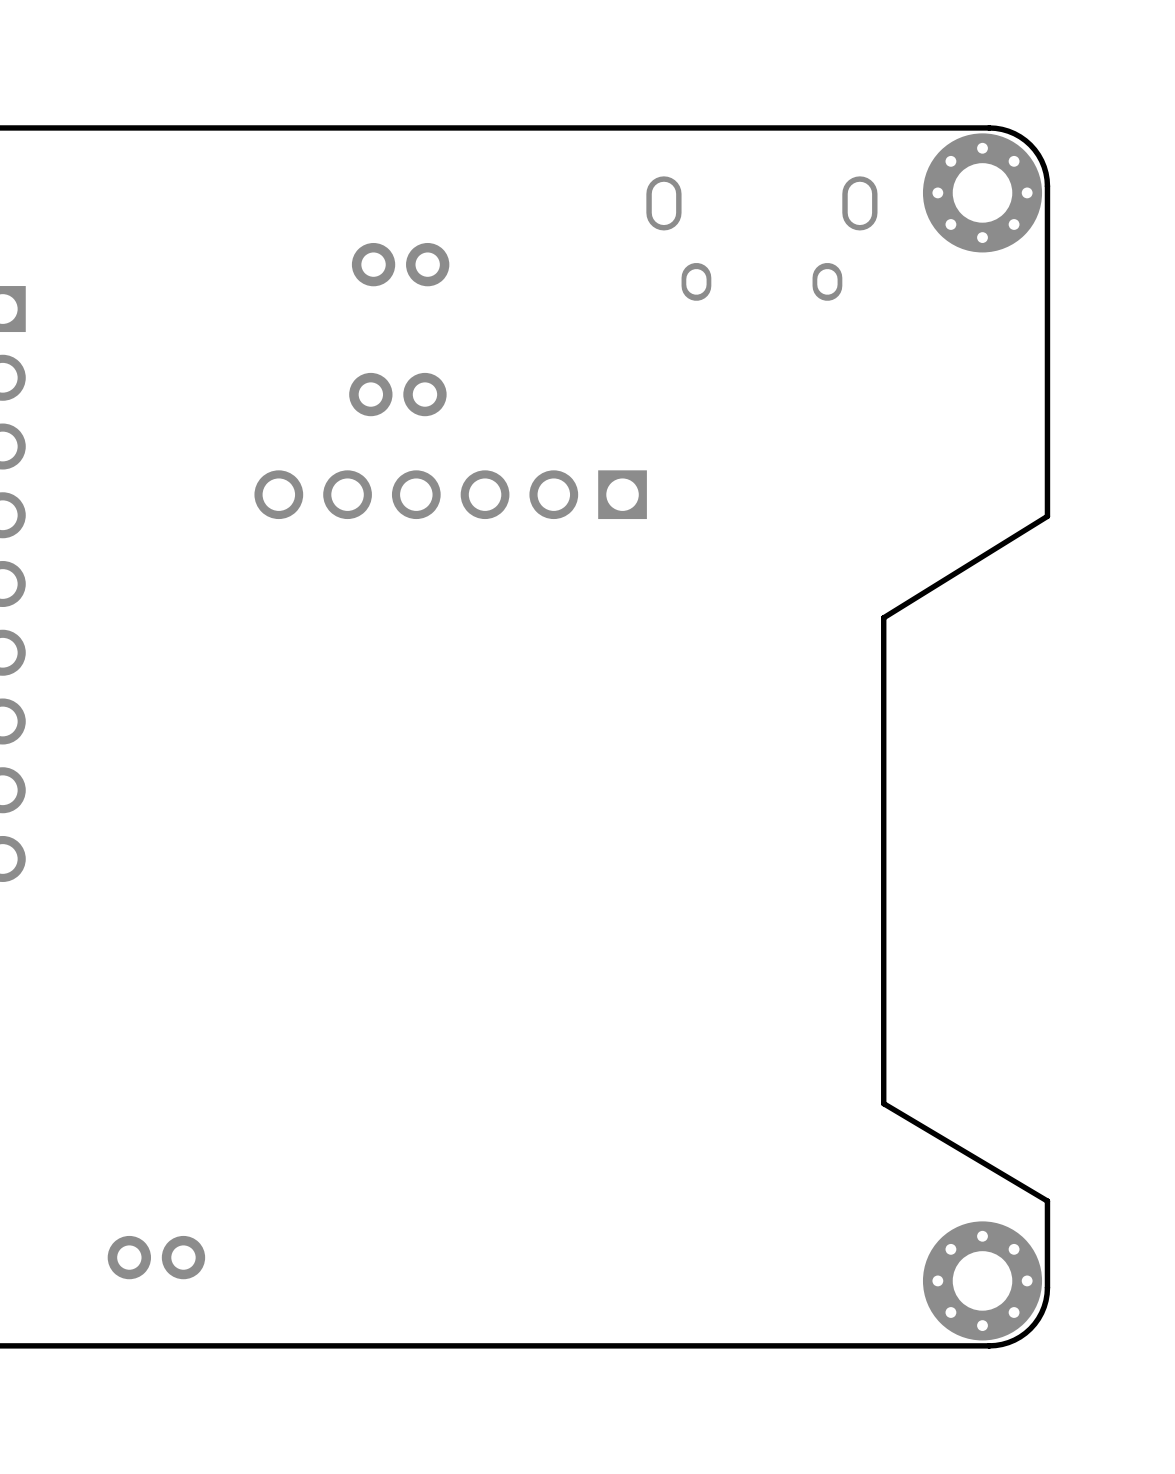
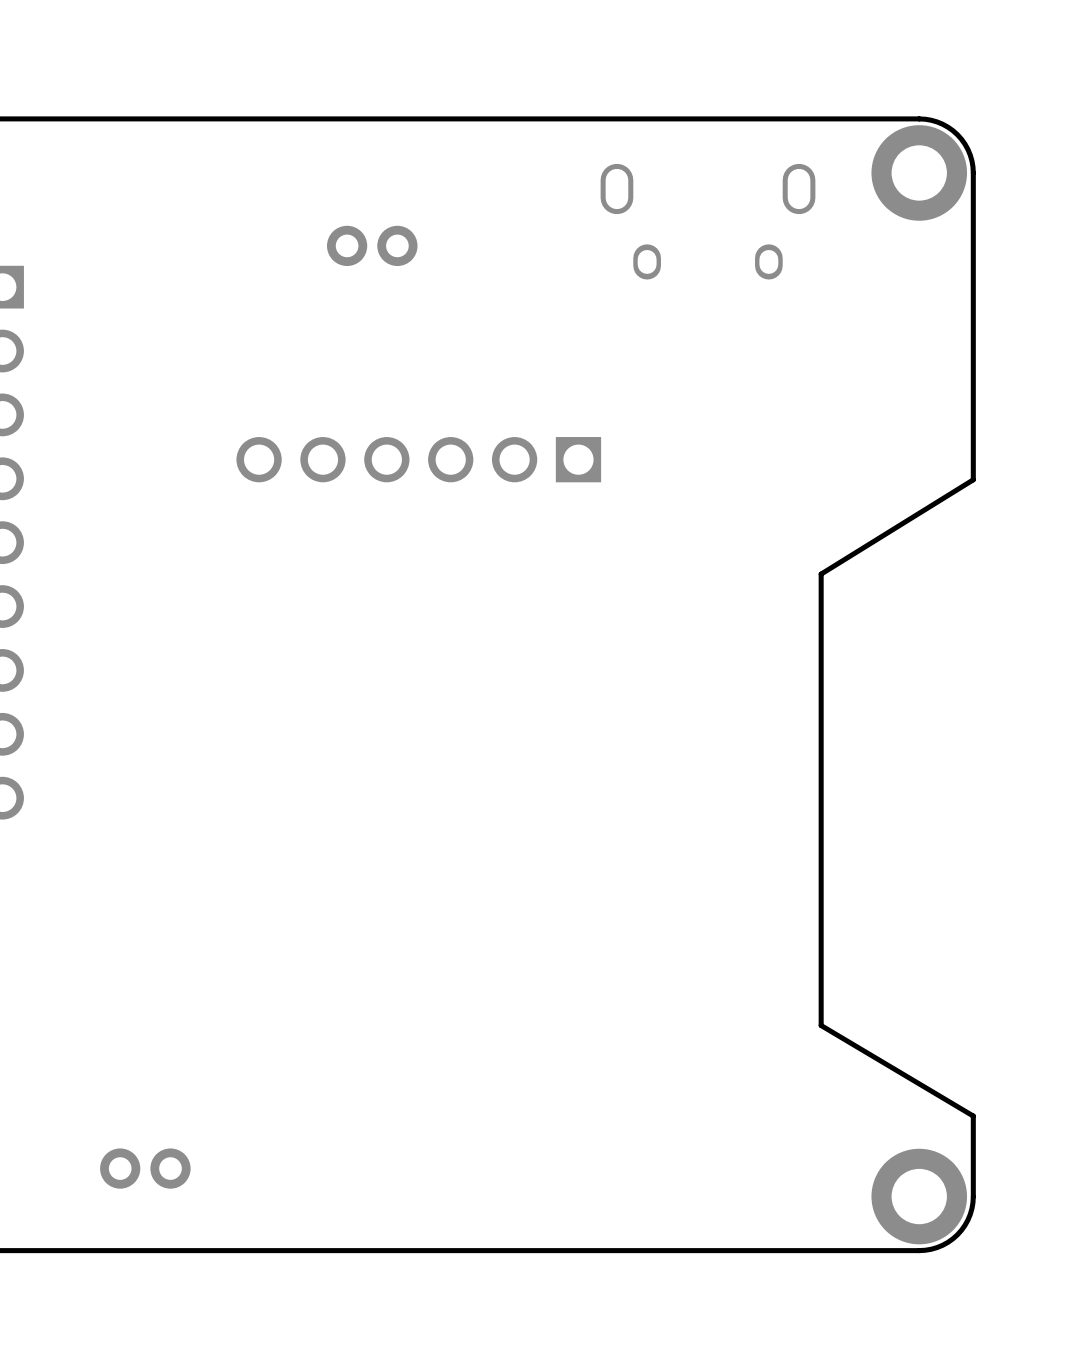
part footprint: [922, 133, 1043, 253] -> [871, 125, 968, 221]
part: (397, 394) -> none
part footprint: [922, 1221, 1043, 1341] -> [871, 1148, 968, 1245]

